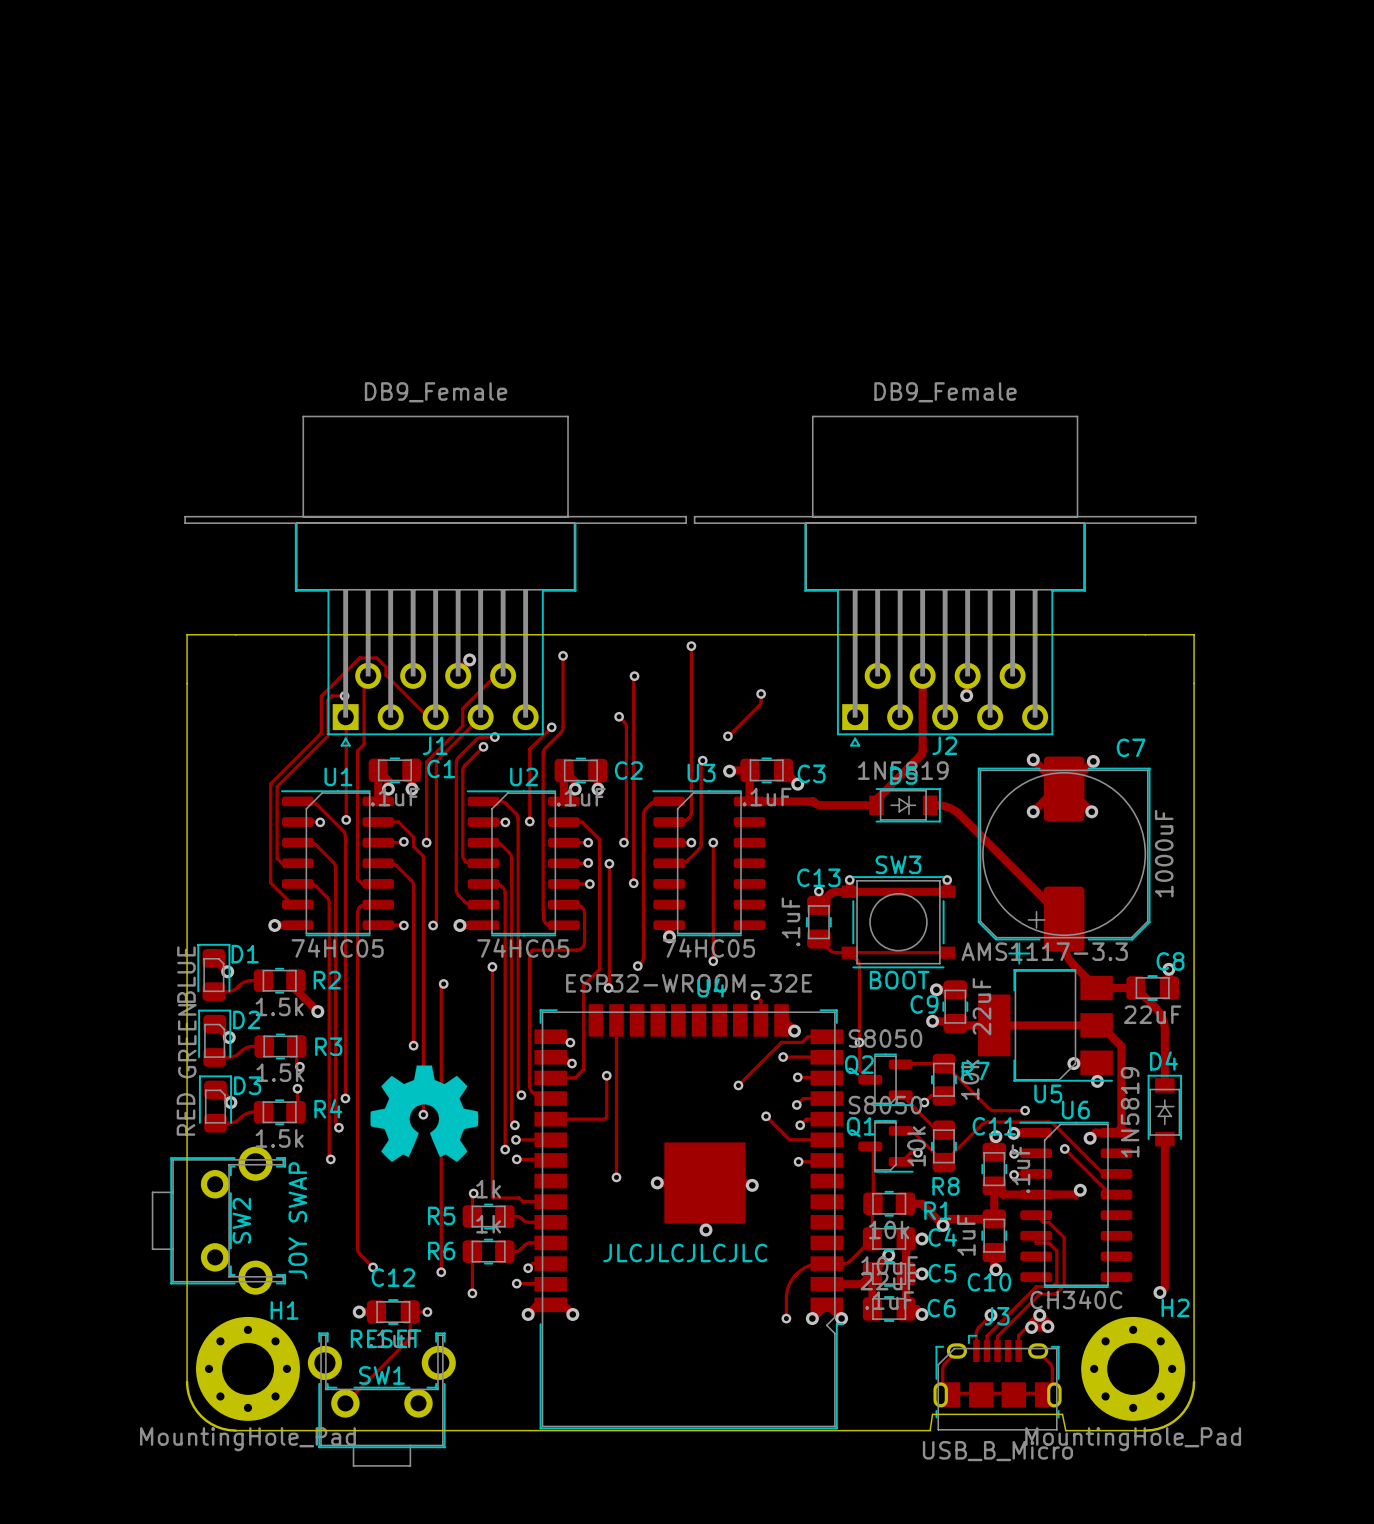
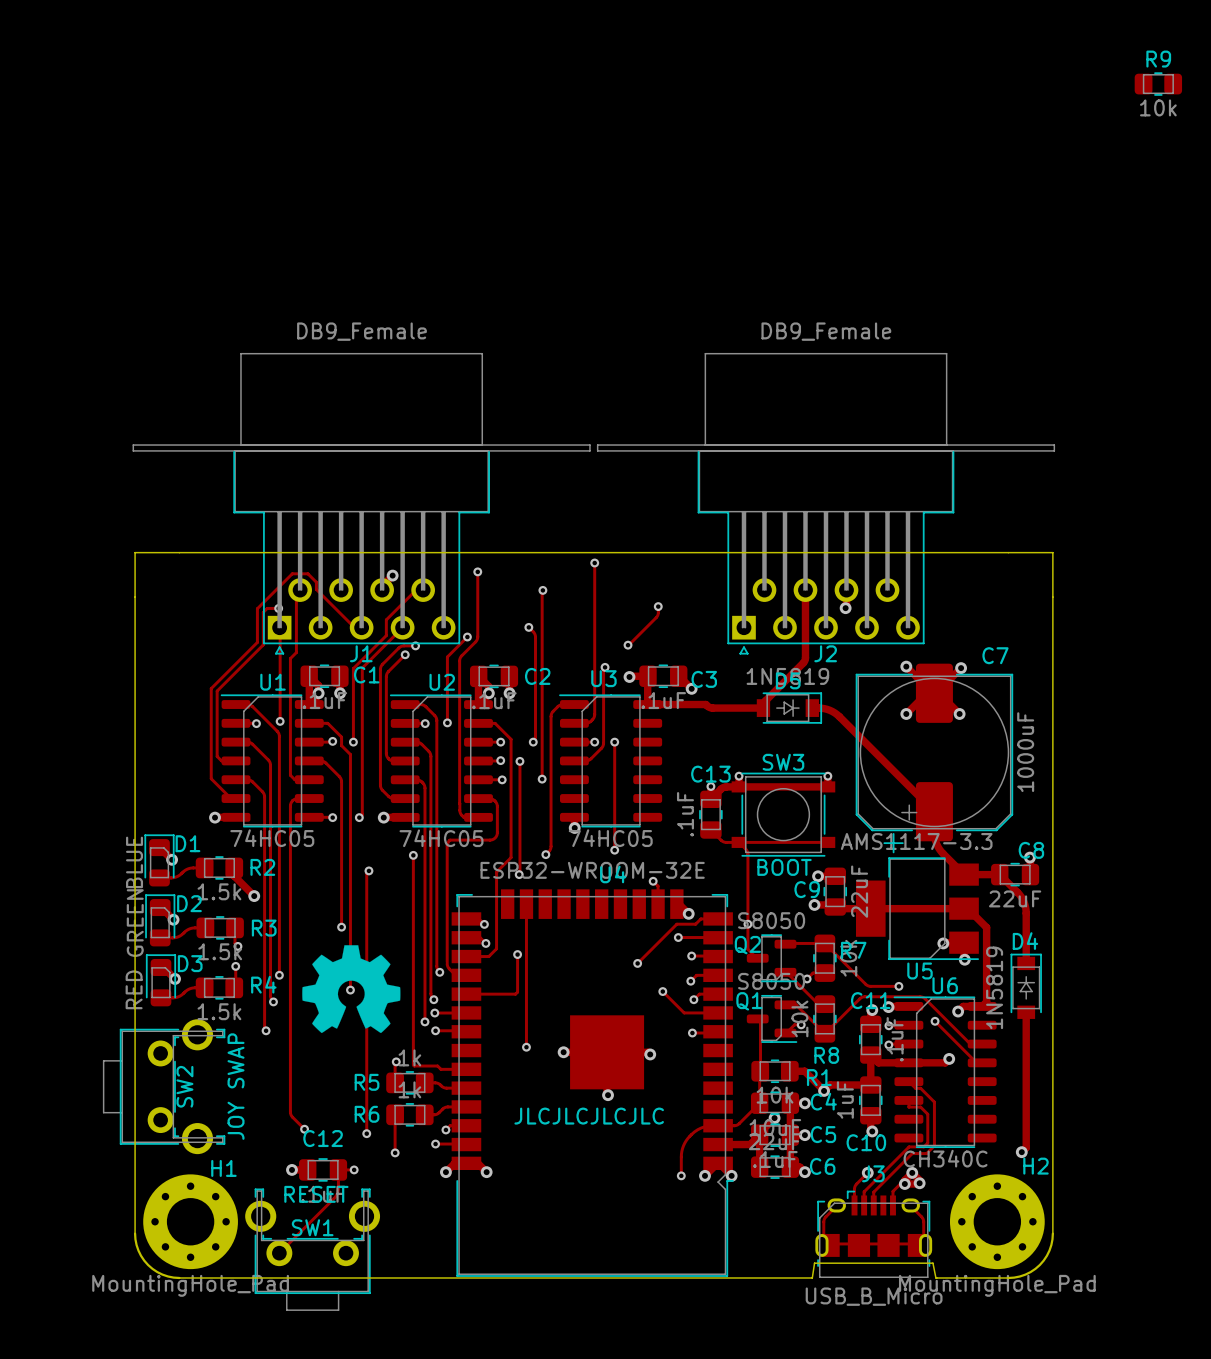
R9: none -> 10k (1158, 84)

